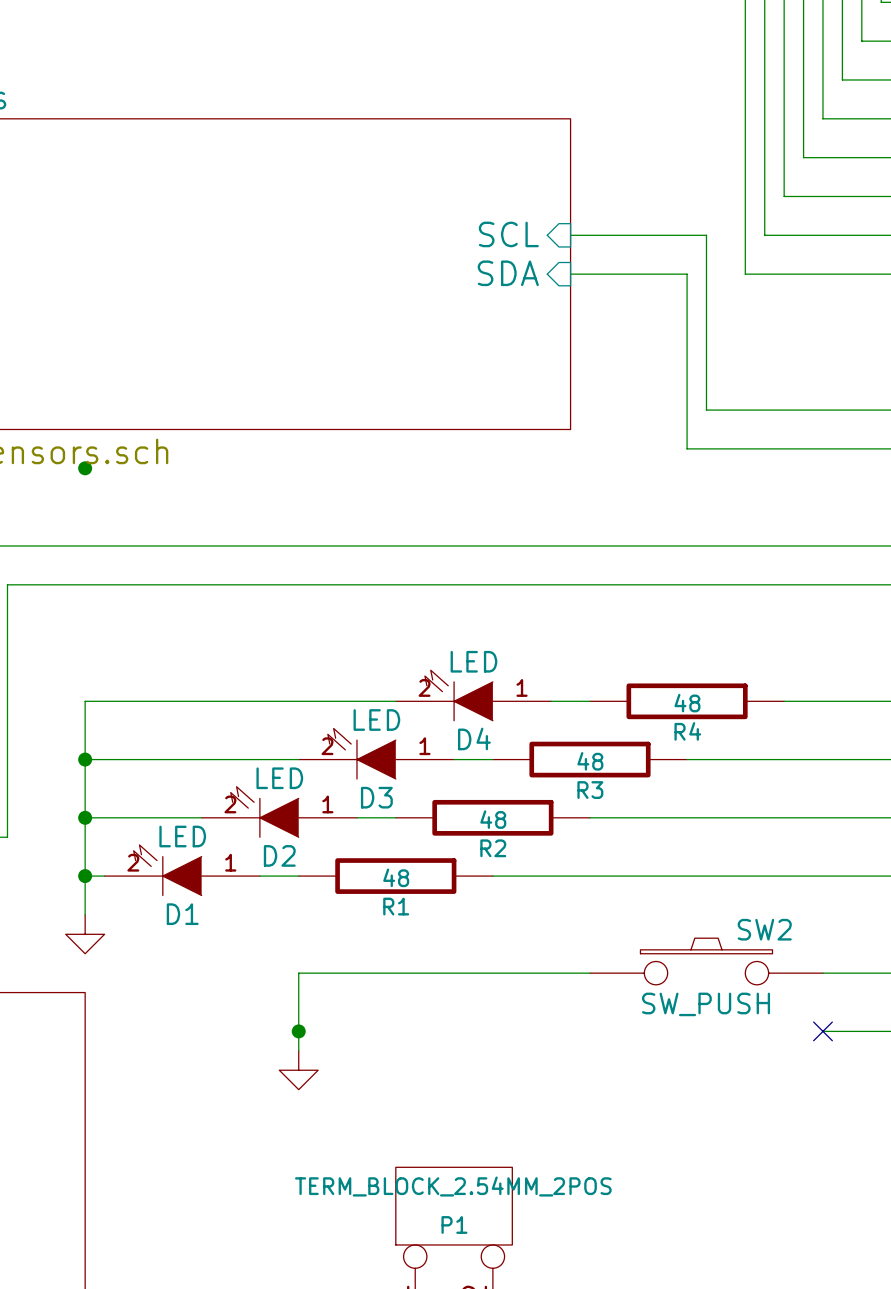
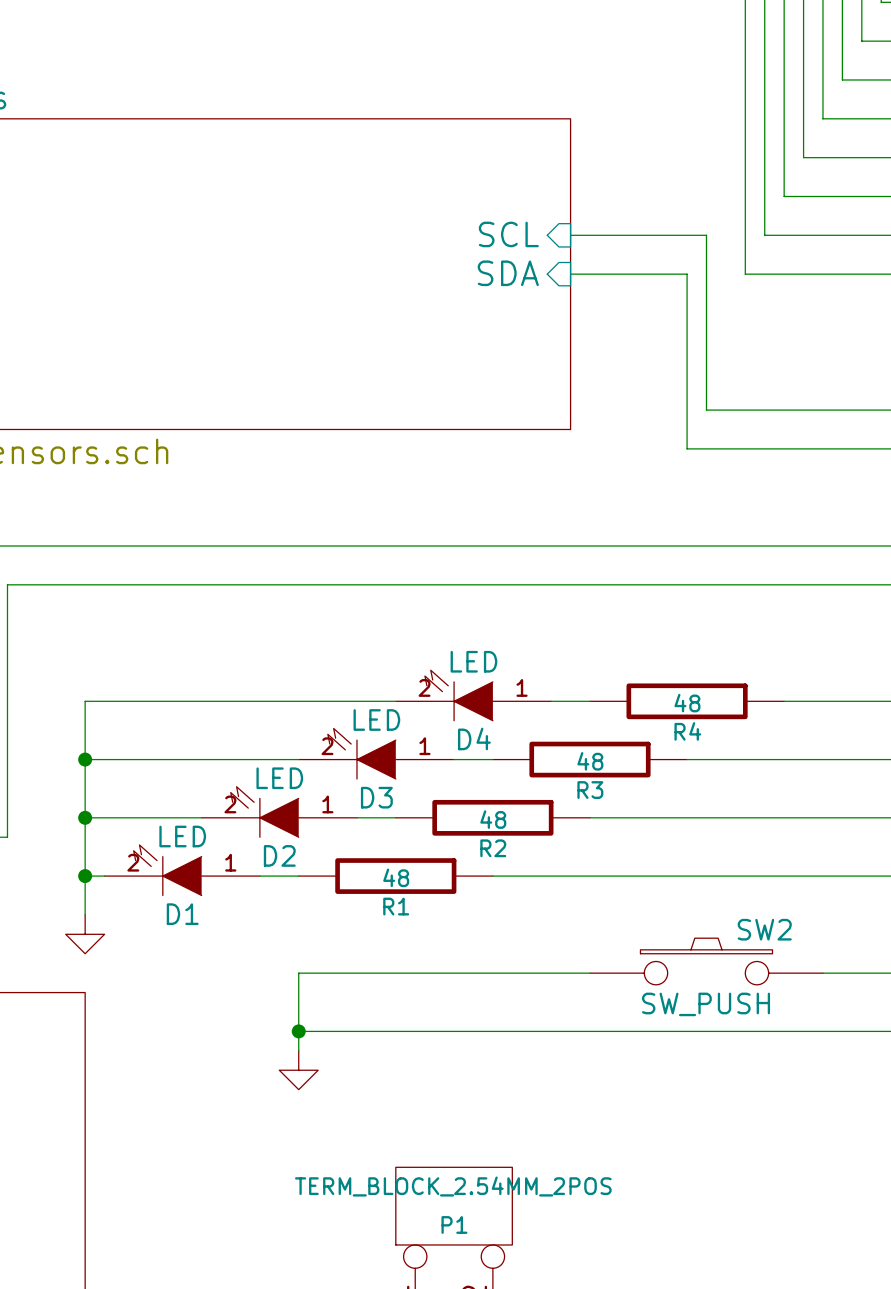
junction: (85, 468) -> none
wire: none -> (298, 1031) (822, 1031)
no-connect mark: (822, 1031) -> none

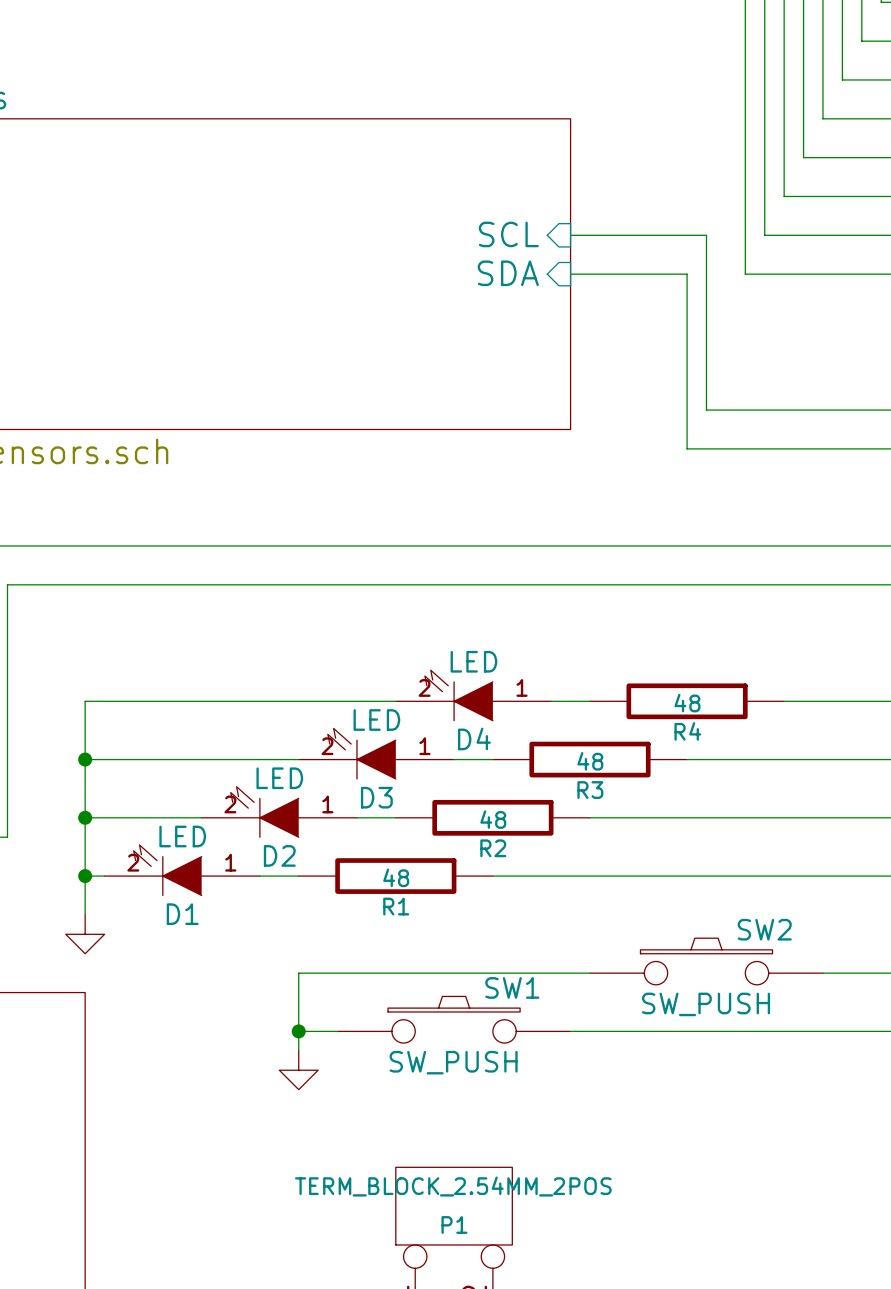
SW1: none -> SW_PUSH (454, 1019)
wire: (337, 1031) (570, 1031) -> none

